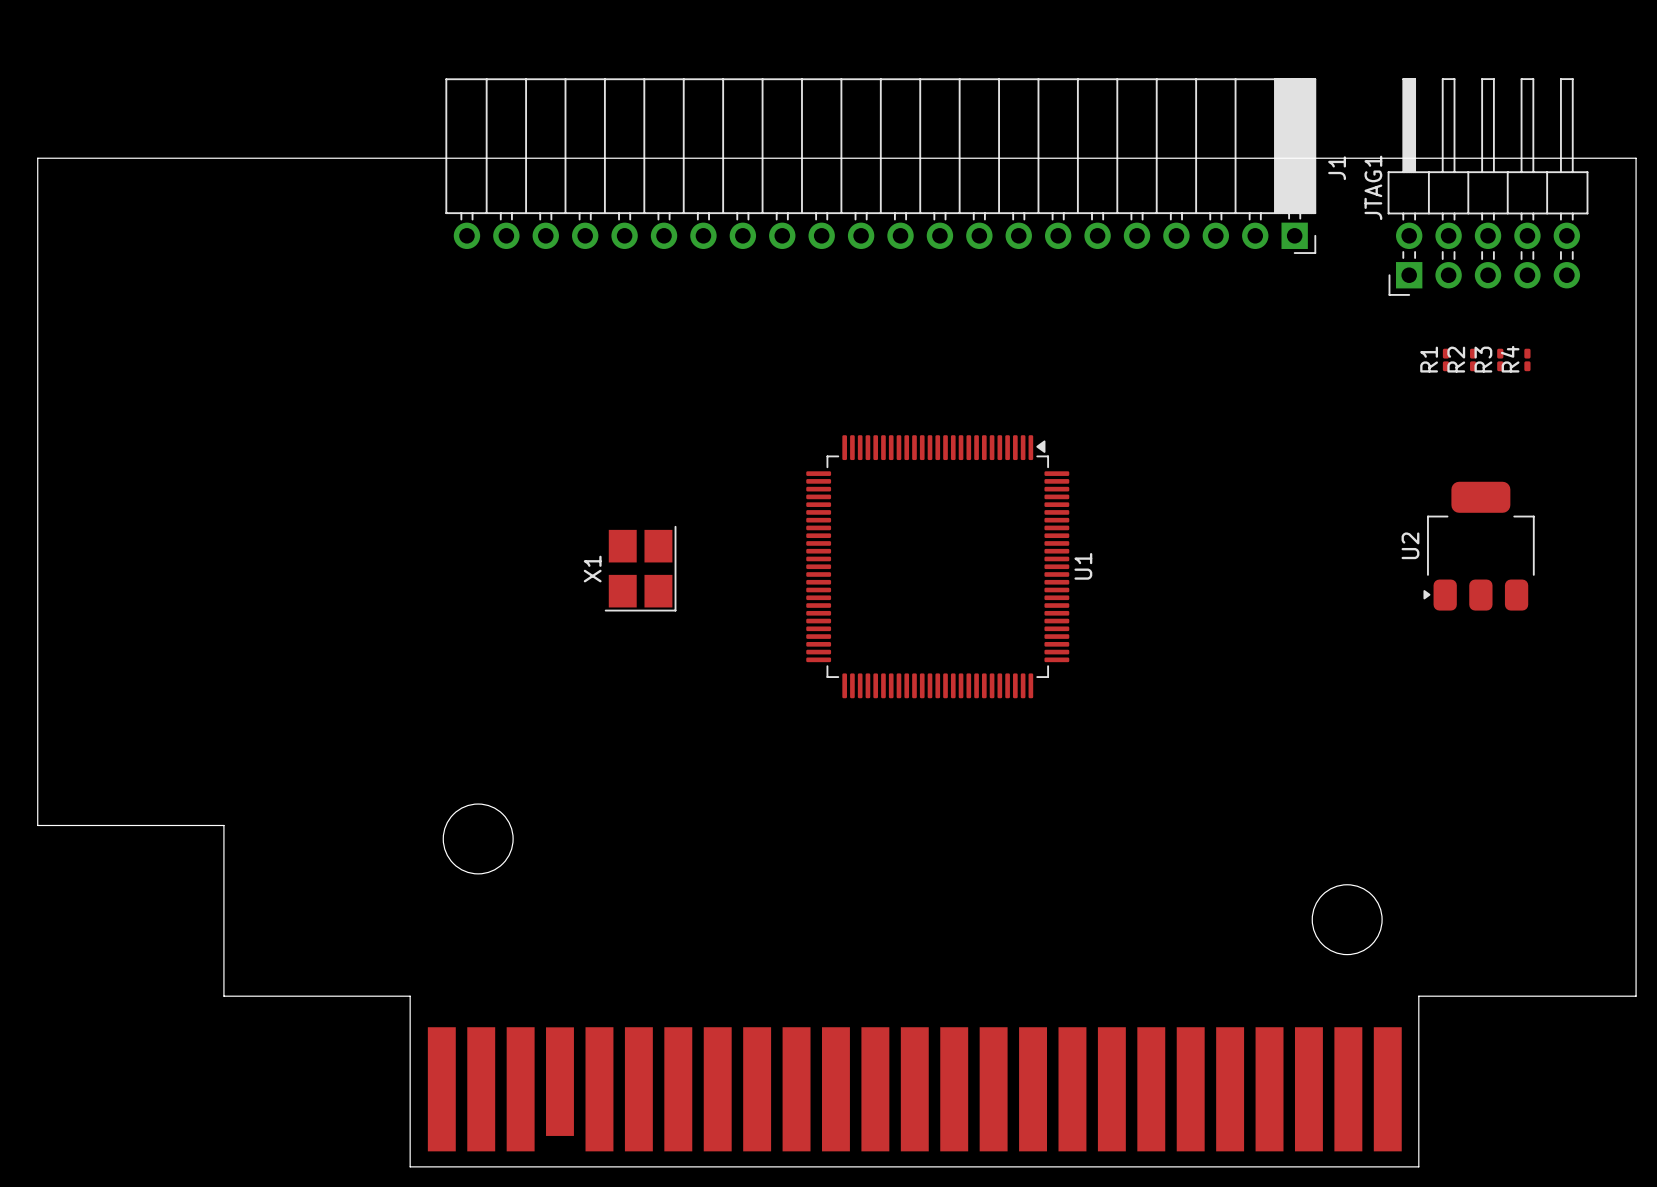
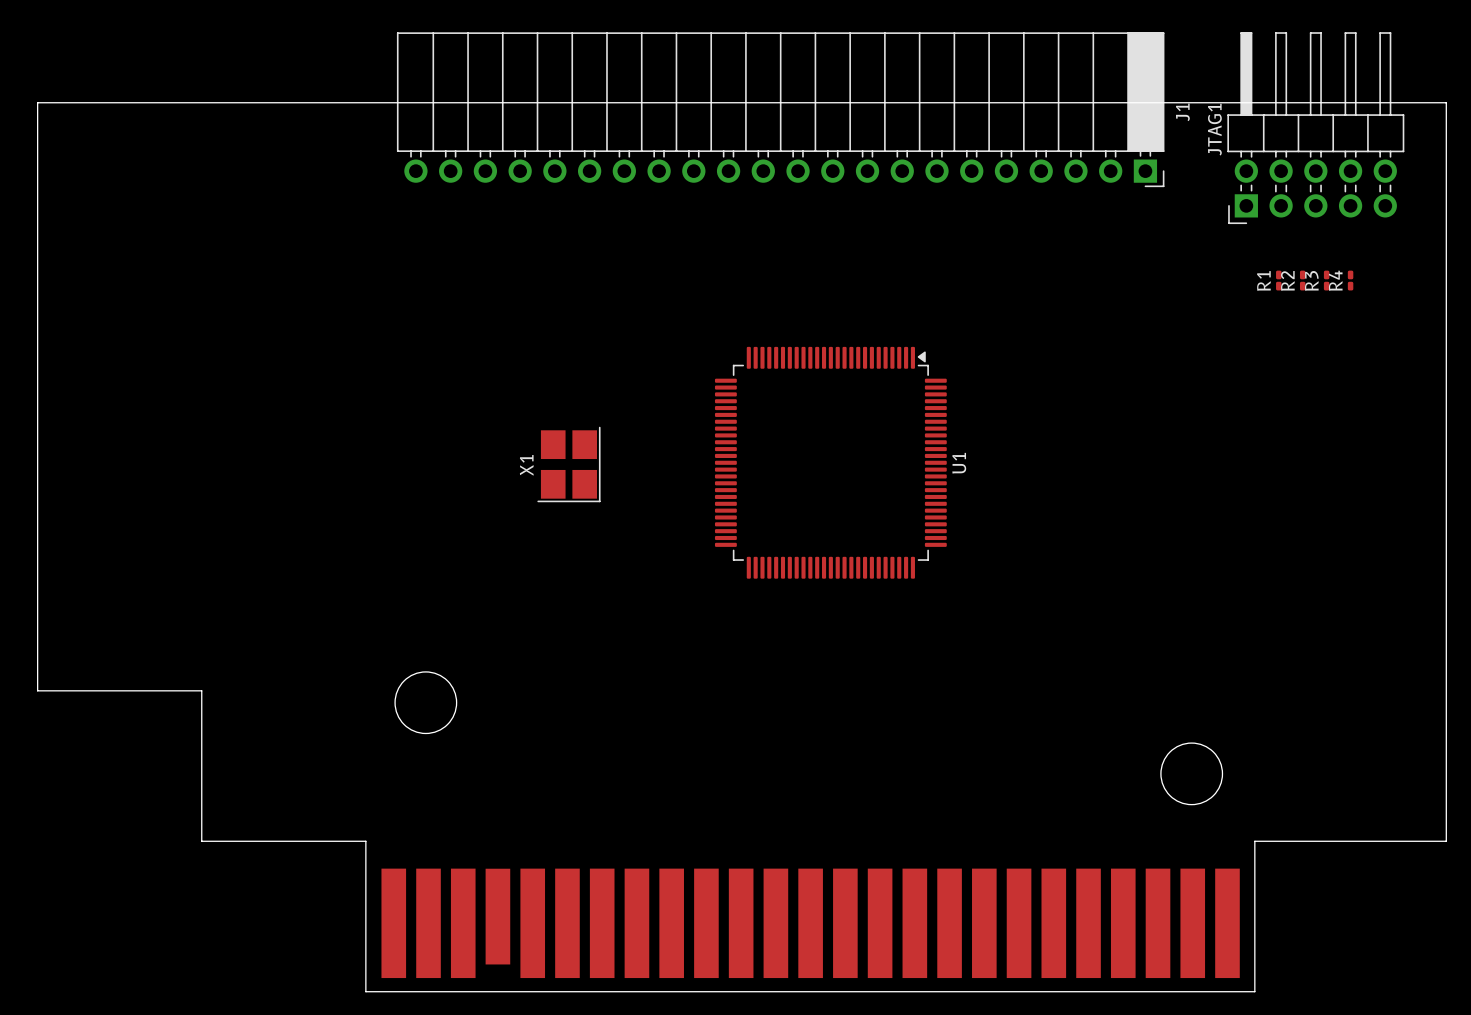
U2: (1479, 546) -> none

